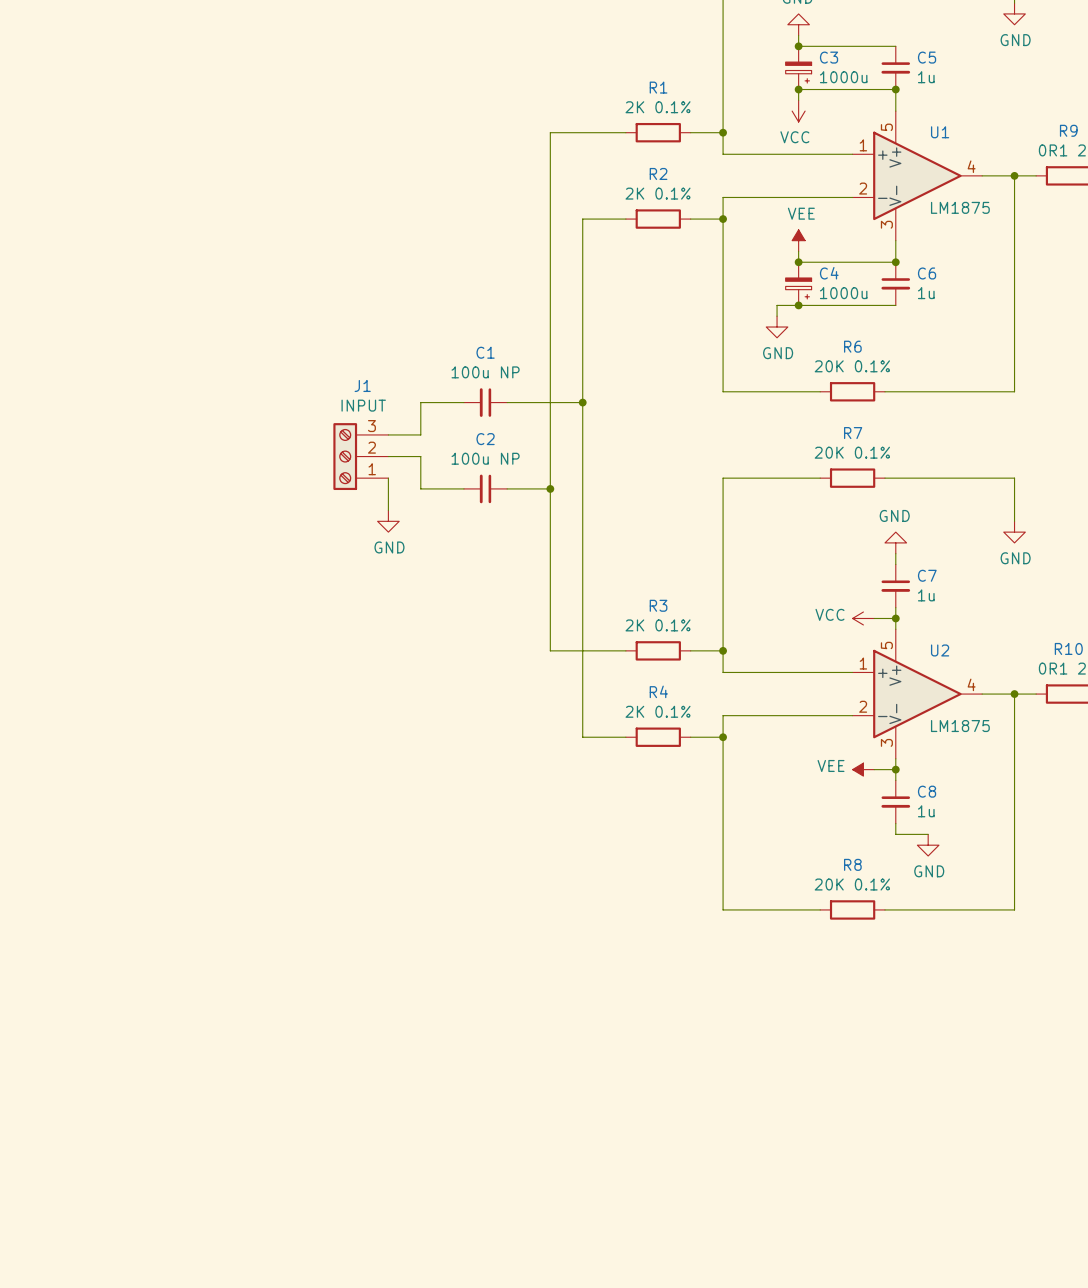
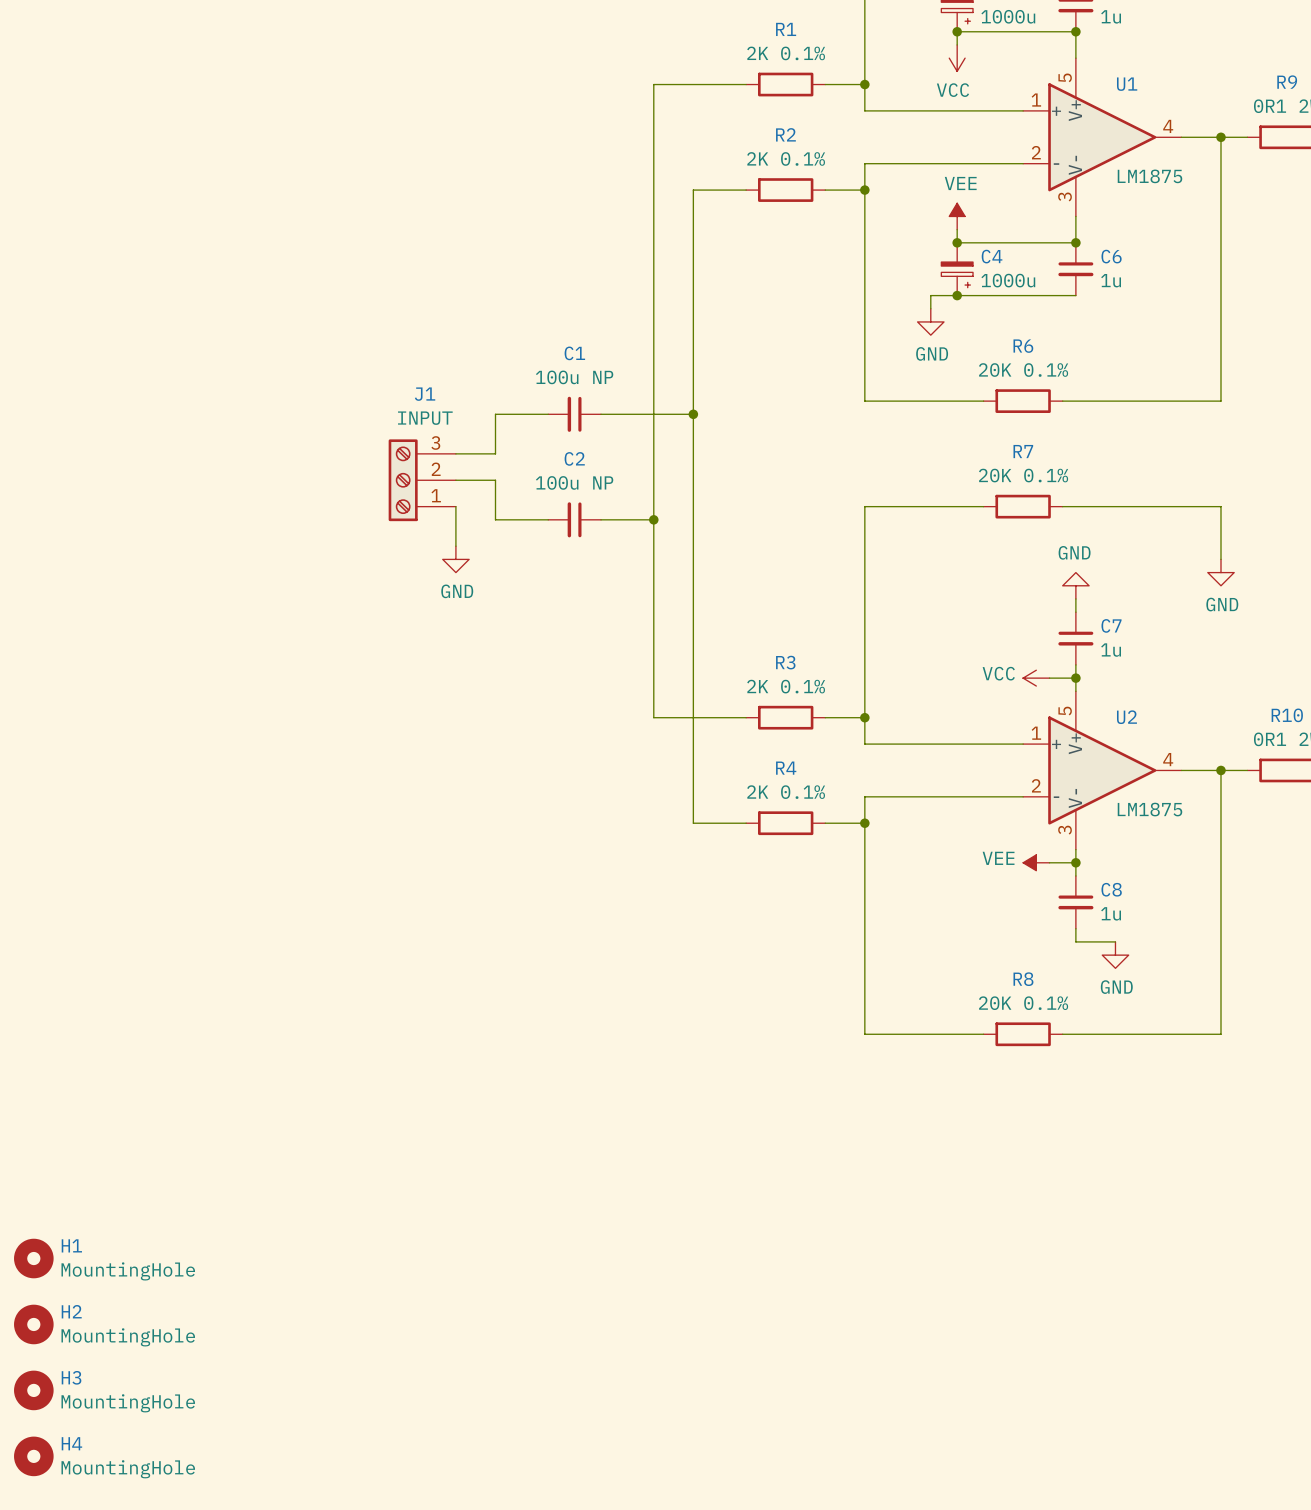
H1: none -> MountingHole (33, 1258)
H2: none -> MountingHole (33, 1324)
H3: none -> MountingHole (33, 1390)
H4: none -> MountingHole (33, 1456)

